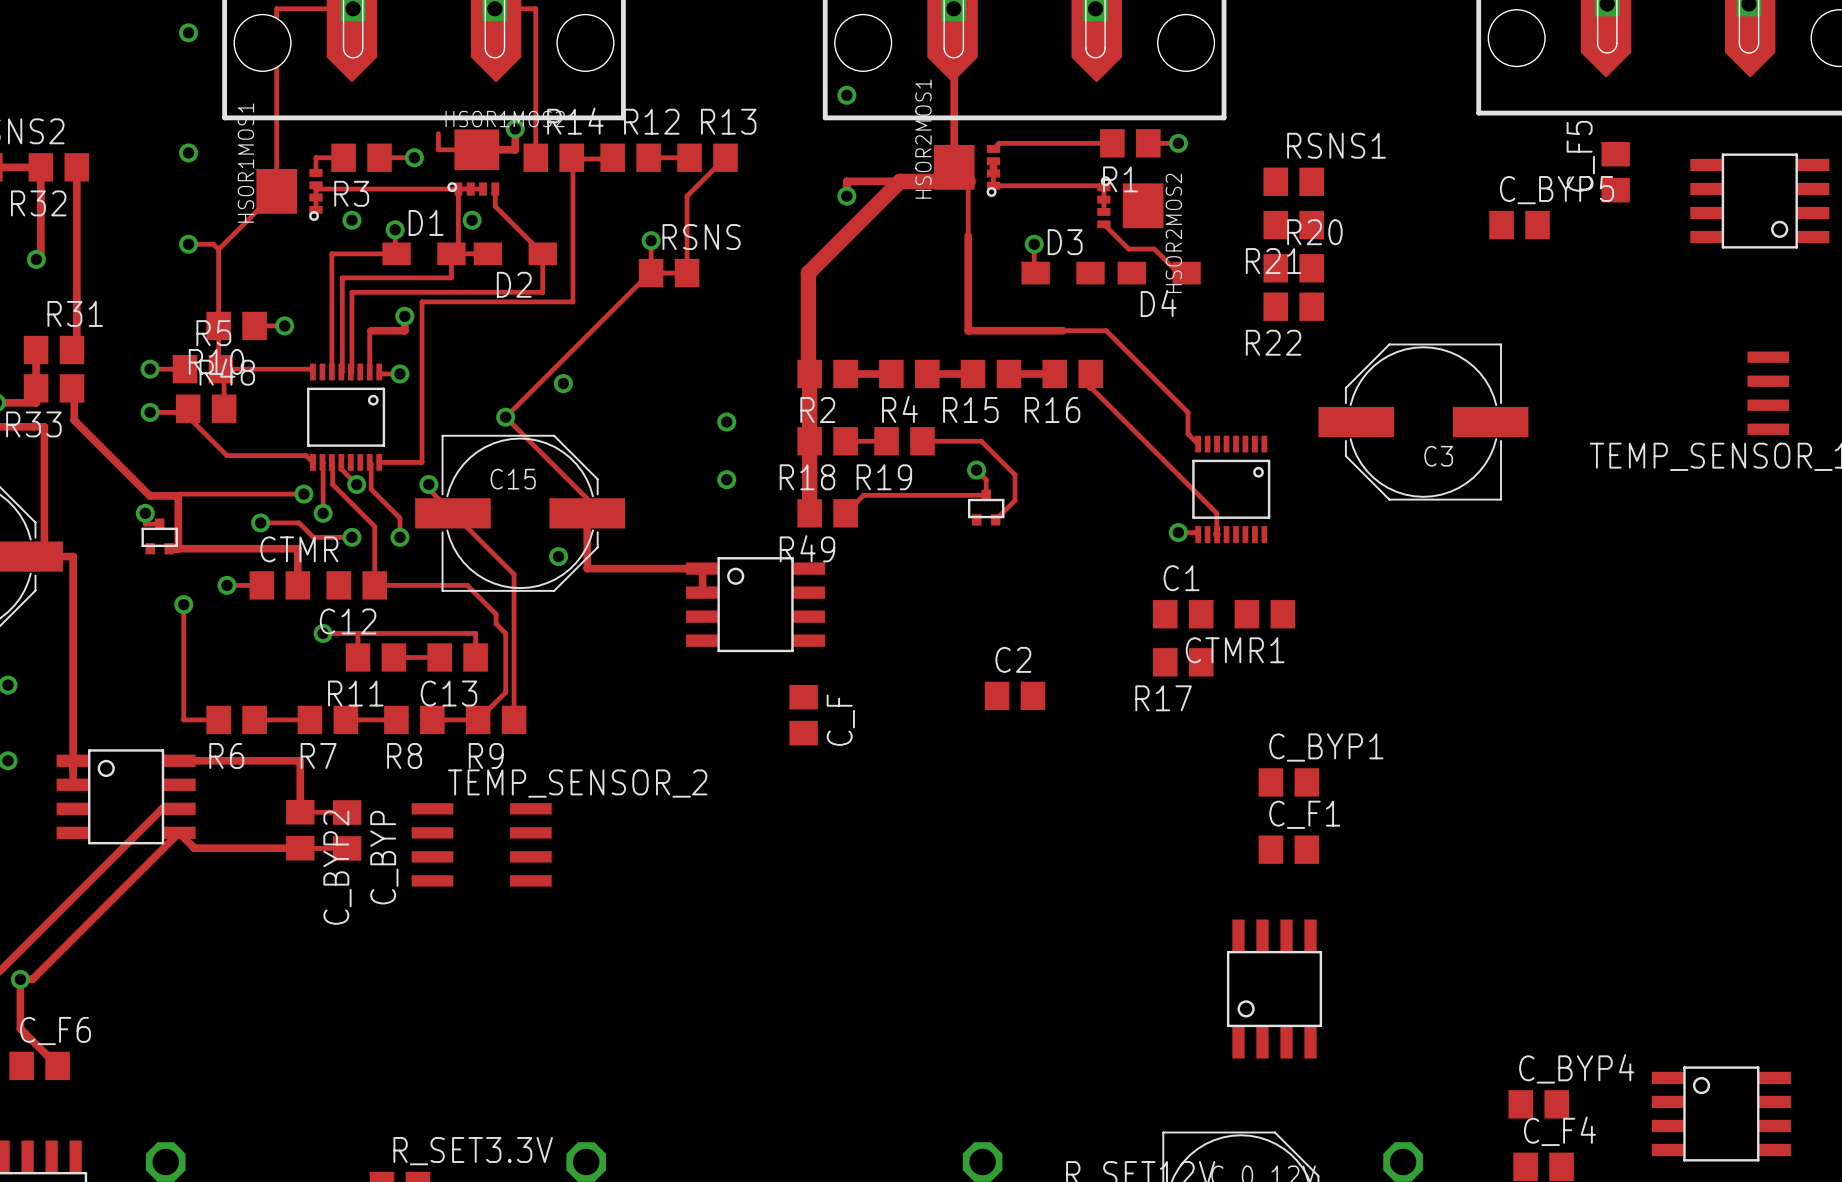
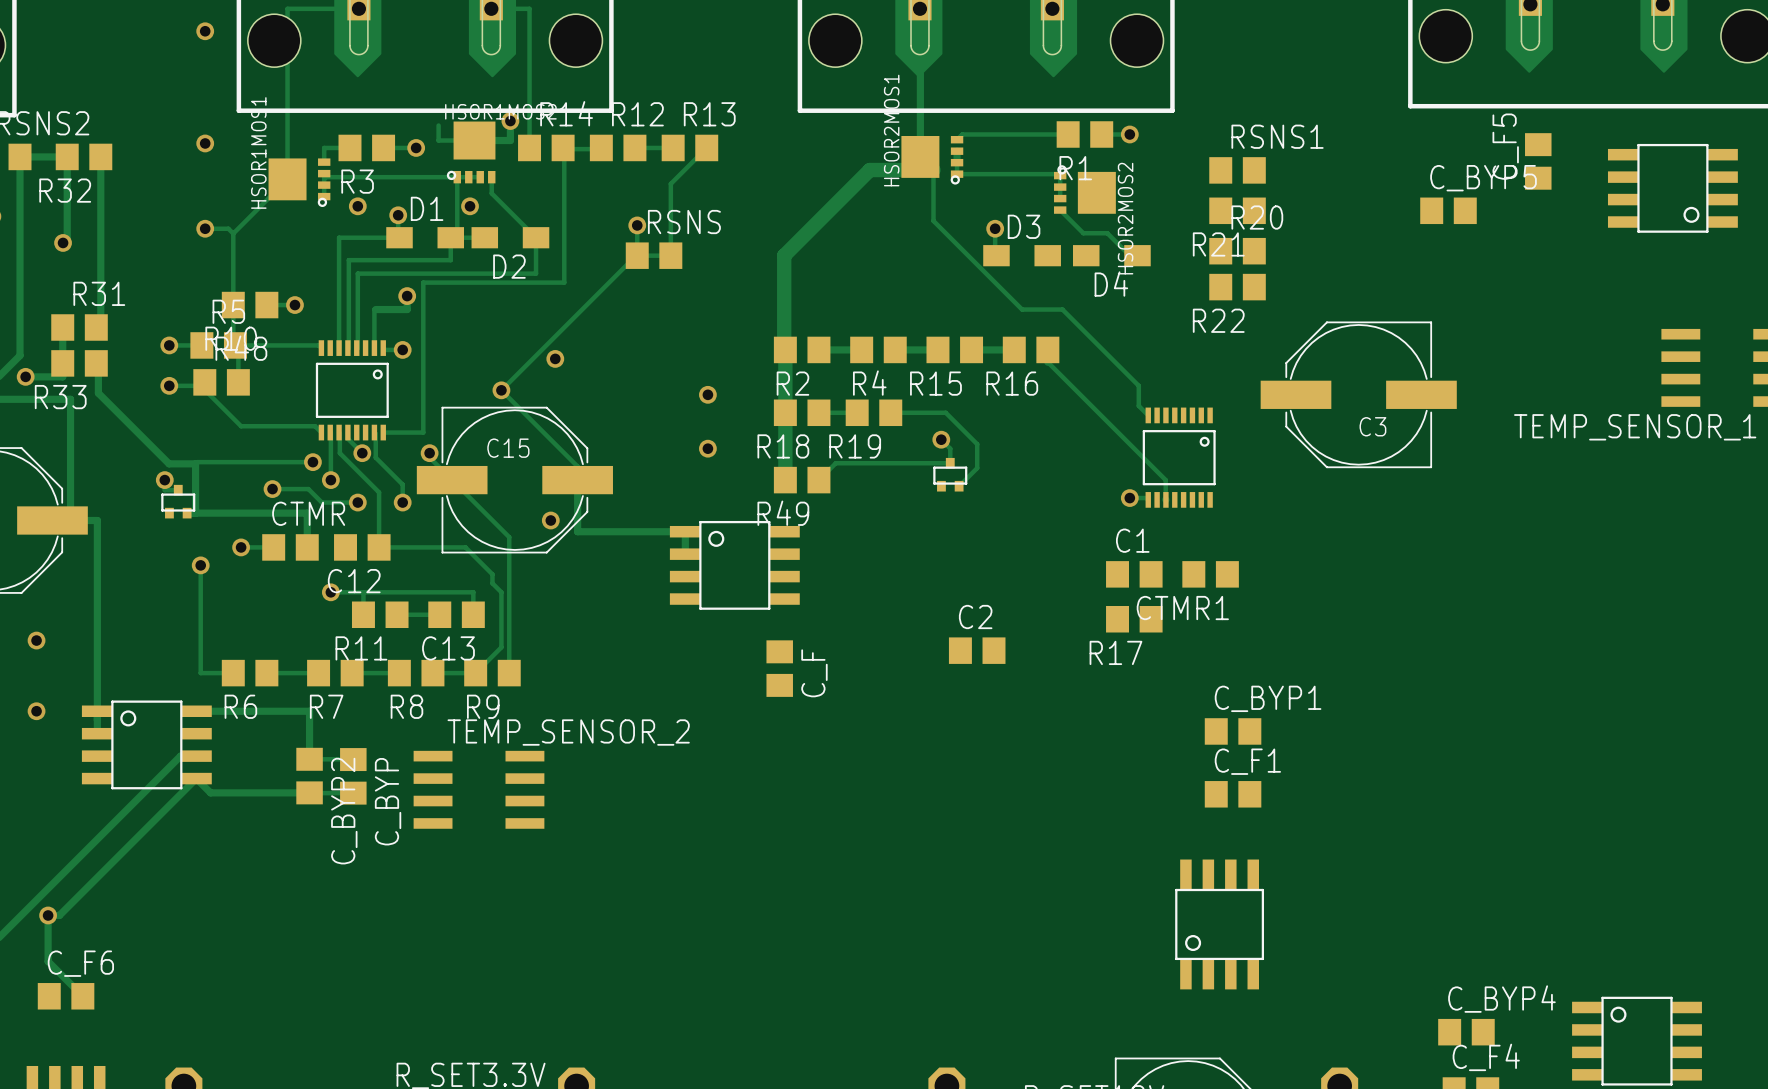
via: (846, 95) -> none
track: (900, 181) (846, 181) (846, 196) -> none
via: (846, 196) -> none
track: (968, 235) (968, 330) (1063, 330) -> (933, 220) (1022, 309)

